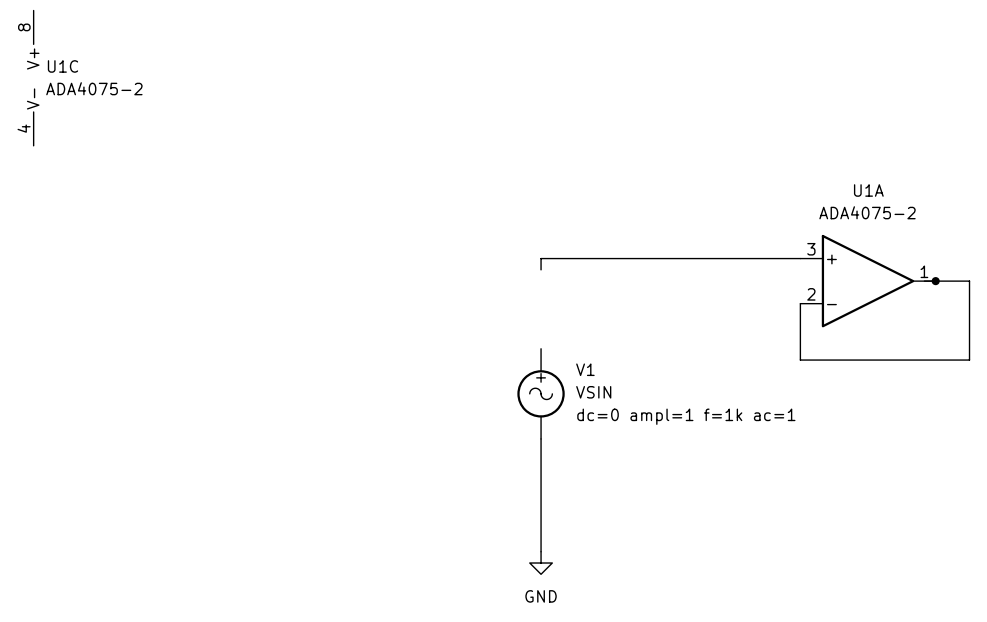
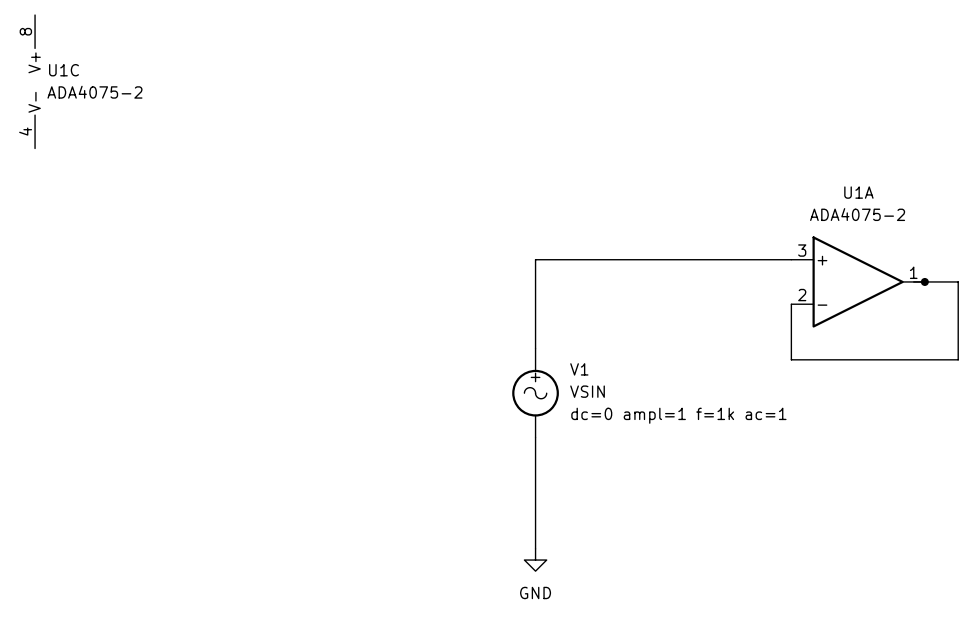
wire: none -> (535, 270) (535, 348)

